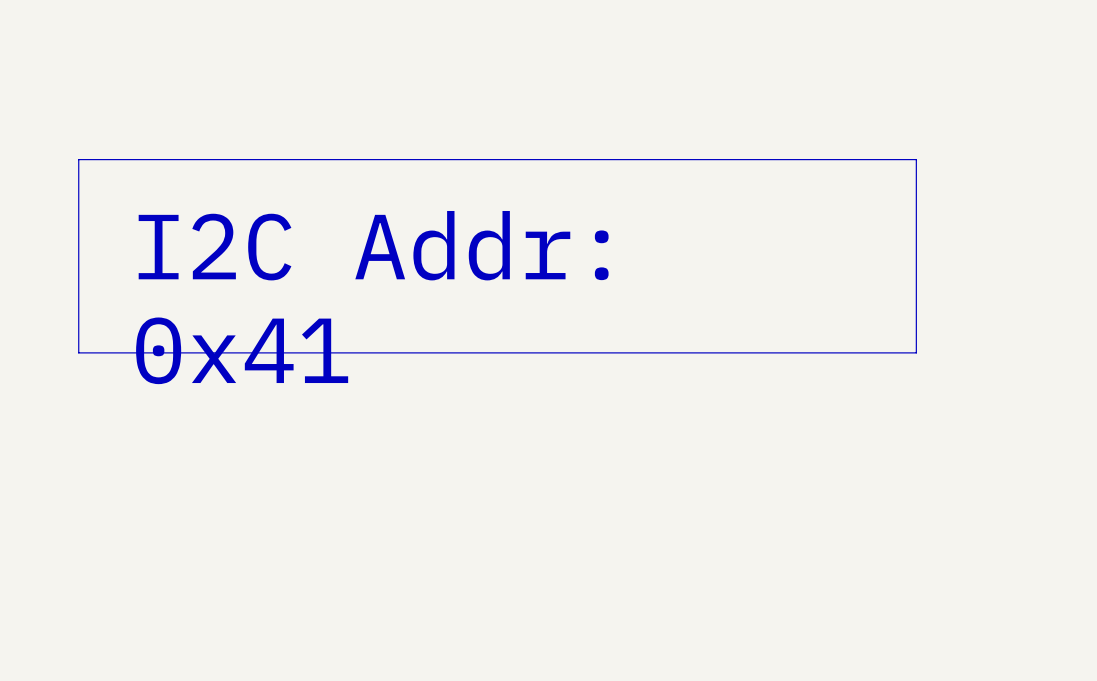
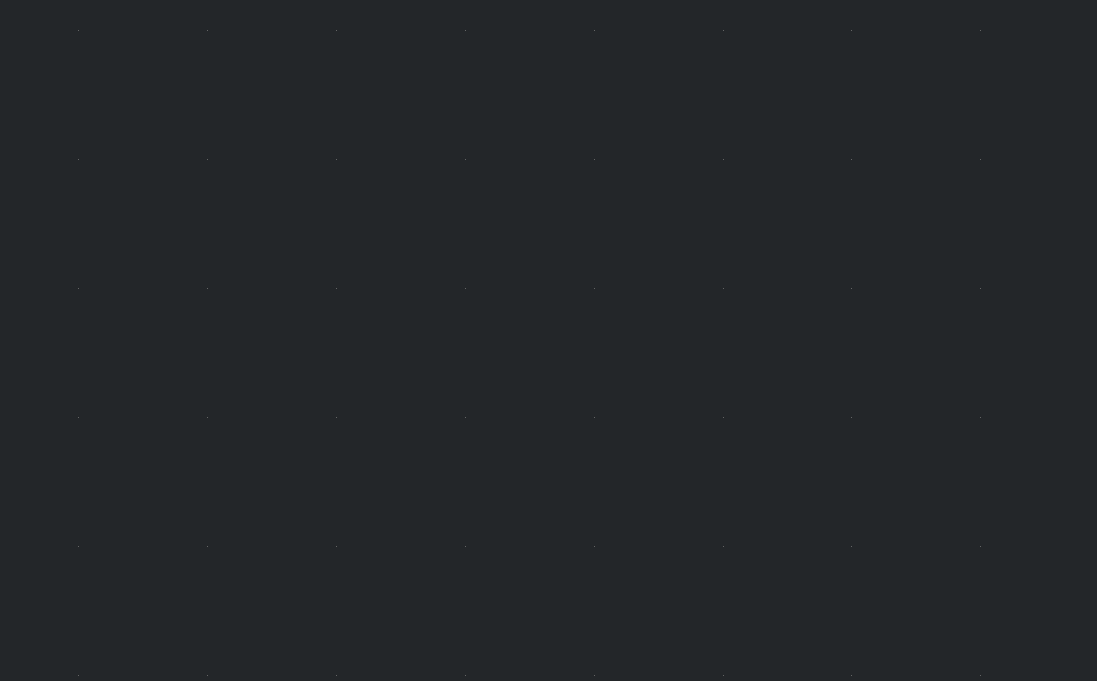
line: (78, 159) (916, 159) (916, 352) (78, 352) (78, 159) -> none
text: I2C Addr: (373, 245) -> none
text: 0x41 (242, 350) -> none

